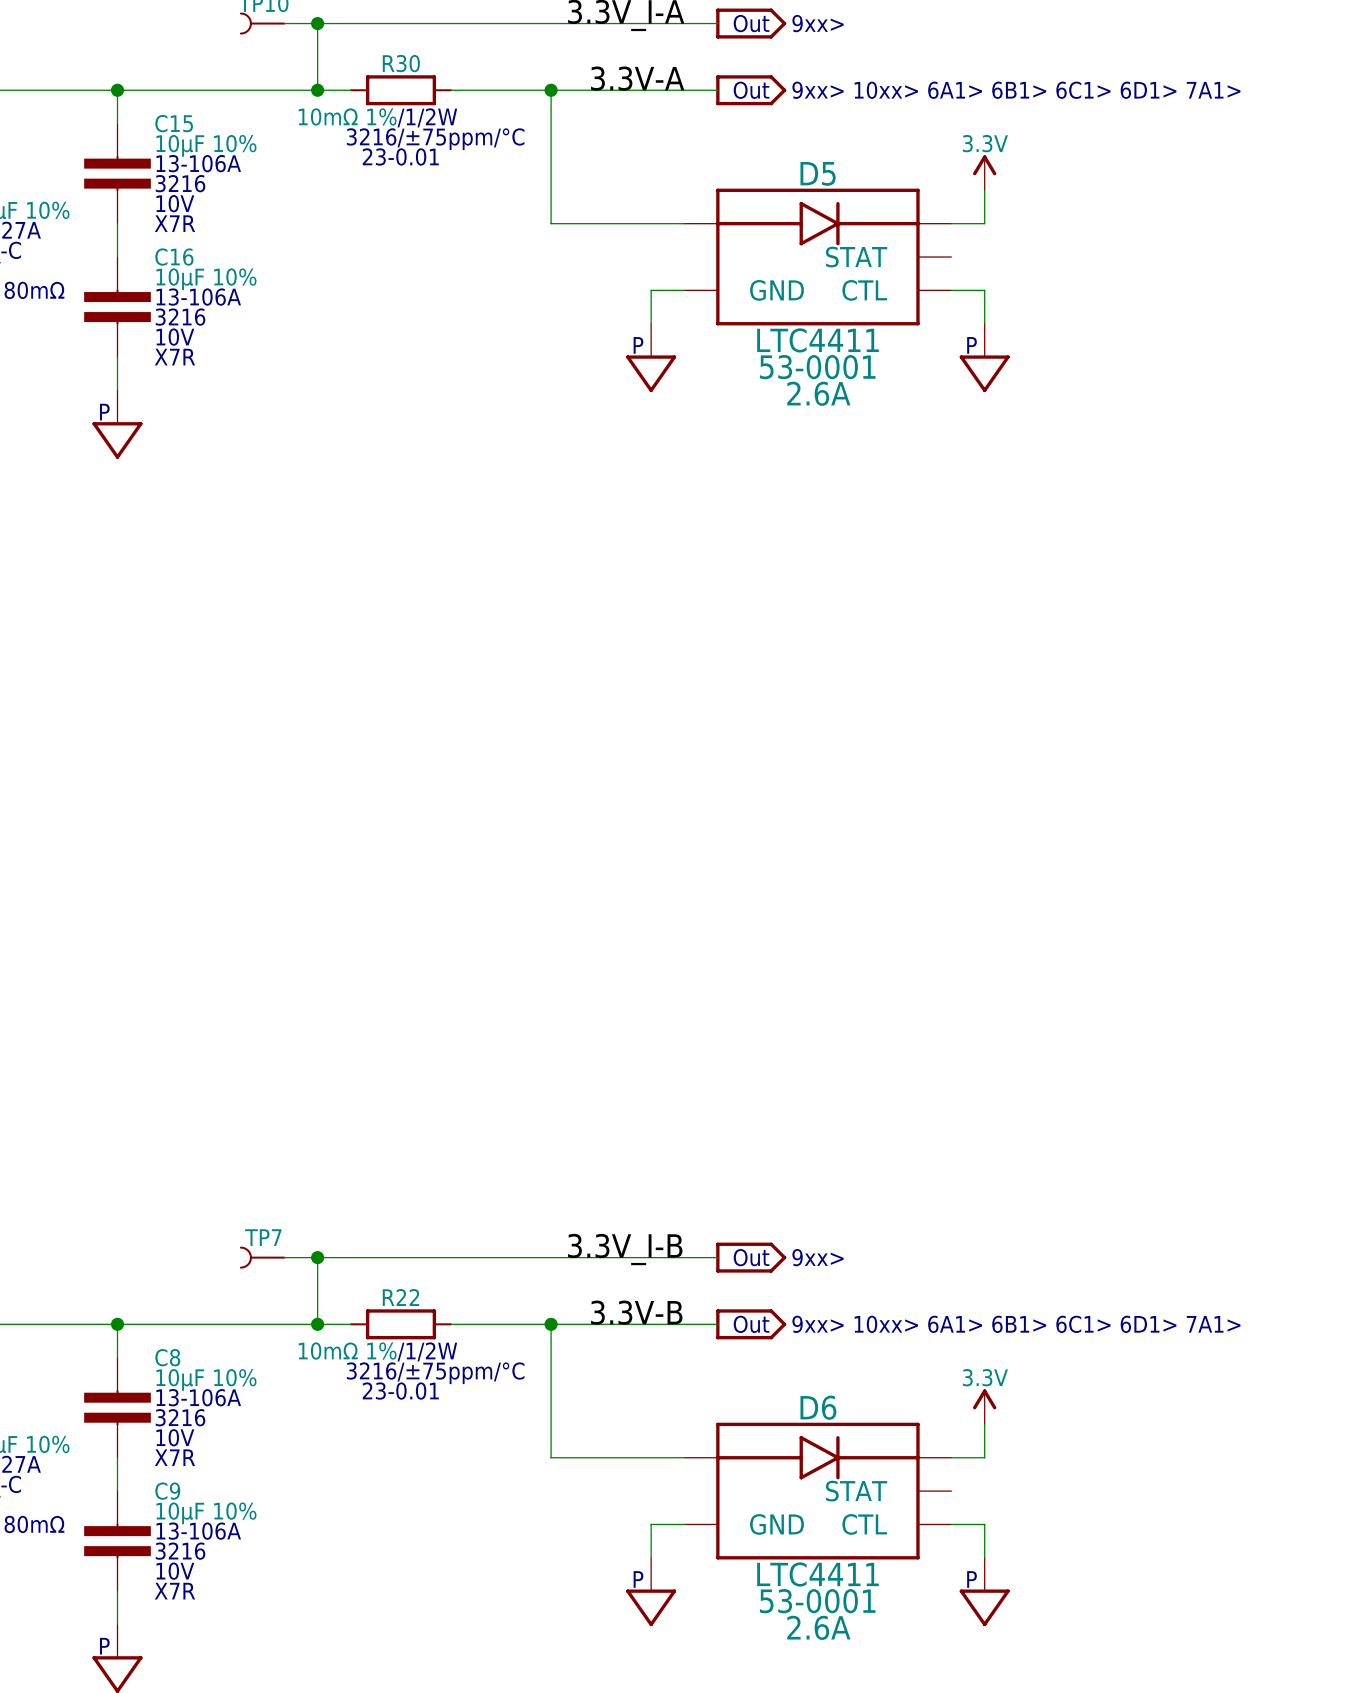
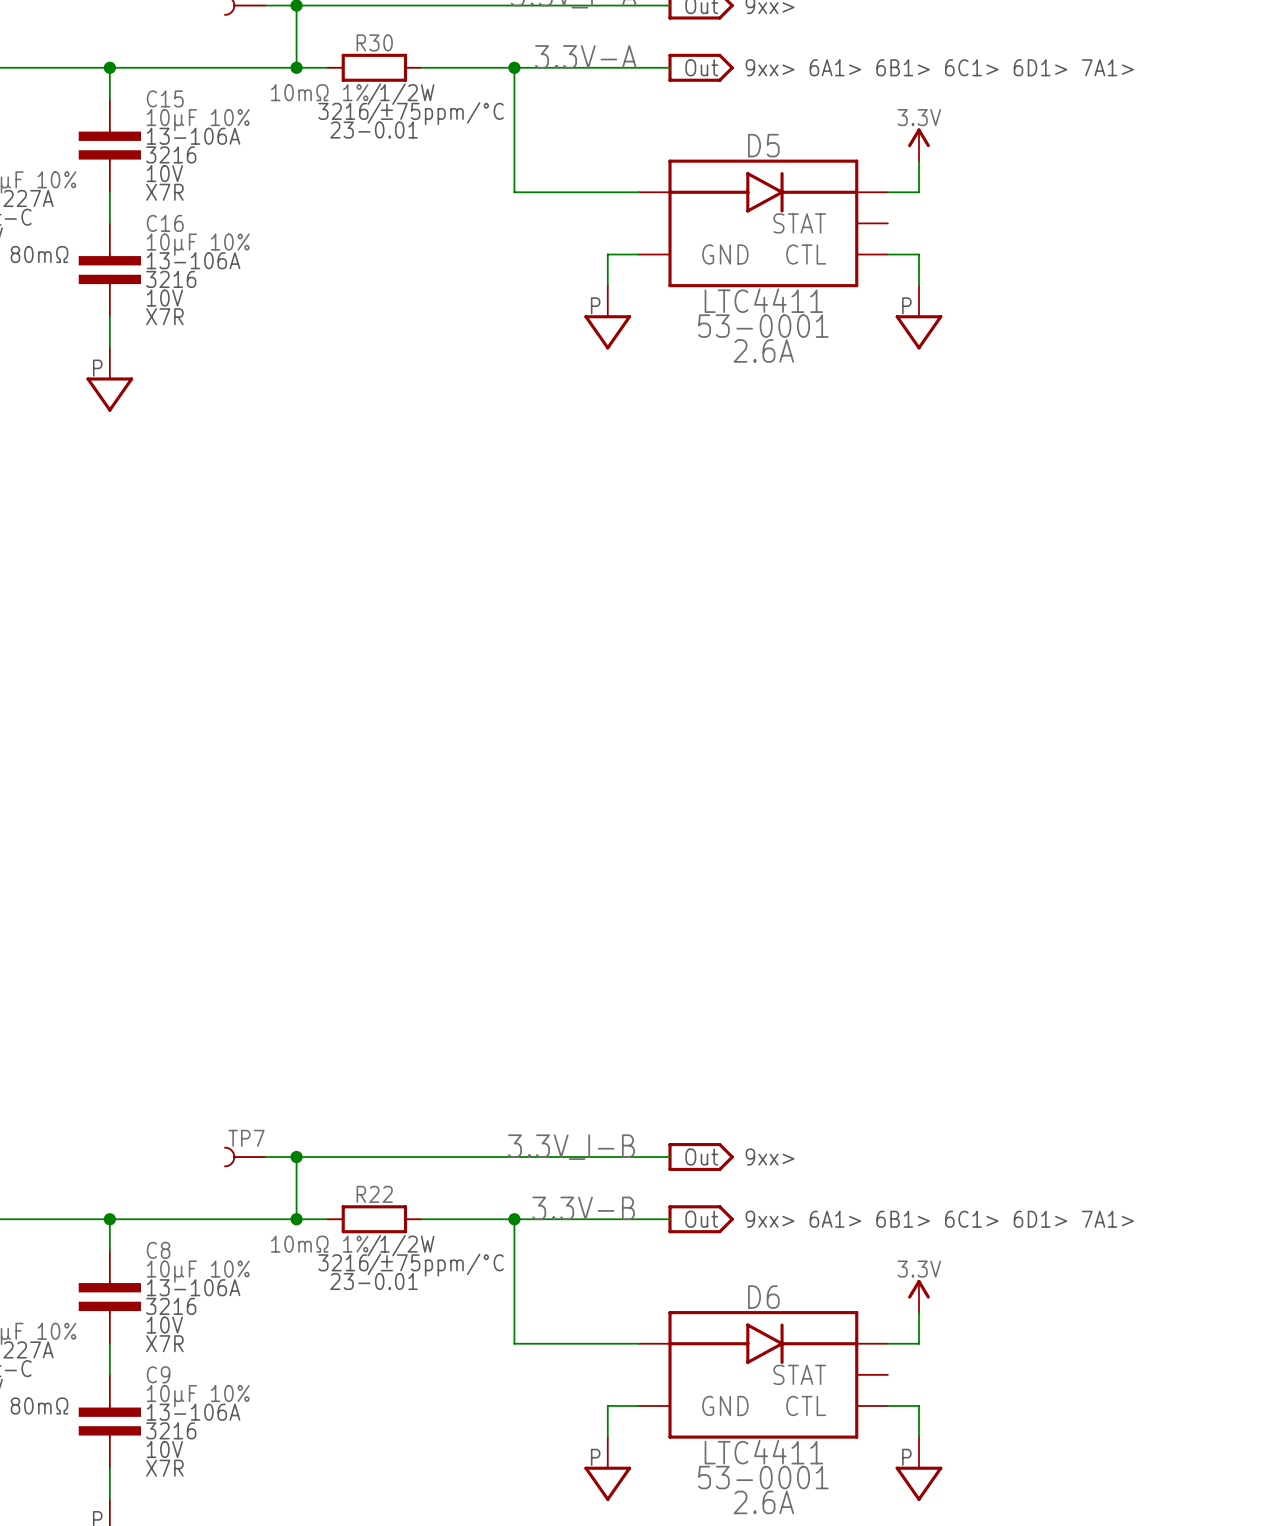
text: 9xx> 10xx> 6A1> 6B1> 6C1> 6D1> 7A1> (1016, 90) -> 9xx> 6A1> 6B1> 6C1> 6D1> 7A1> (939, 67)
text: 9xx> 10xx> 6A1> 6B1> 6C1> 6D1> 7A1> (1016, 1324) -> 9xx> 6A1> 6B1> 6C1> 6D1> 7A1> (939, 1219)

